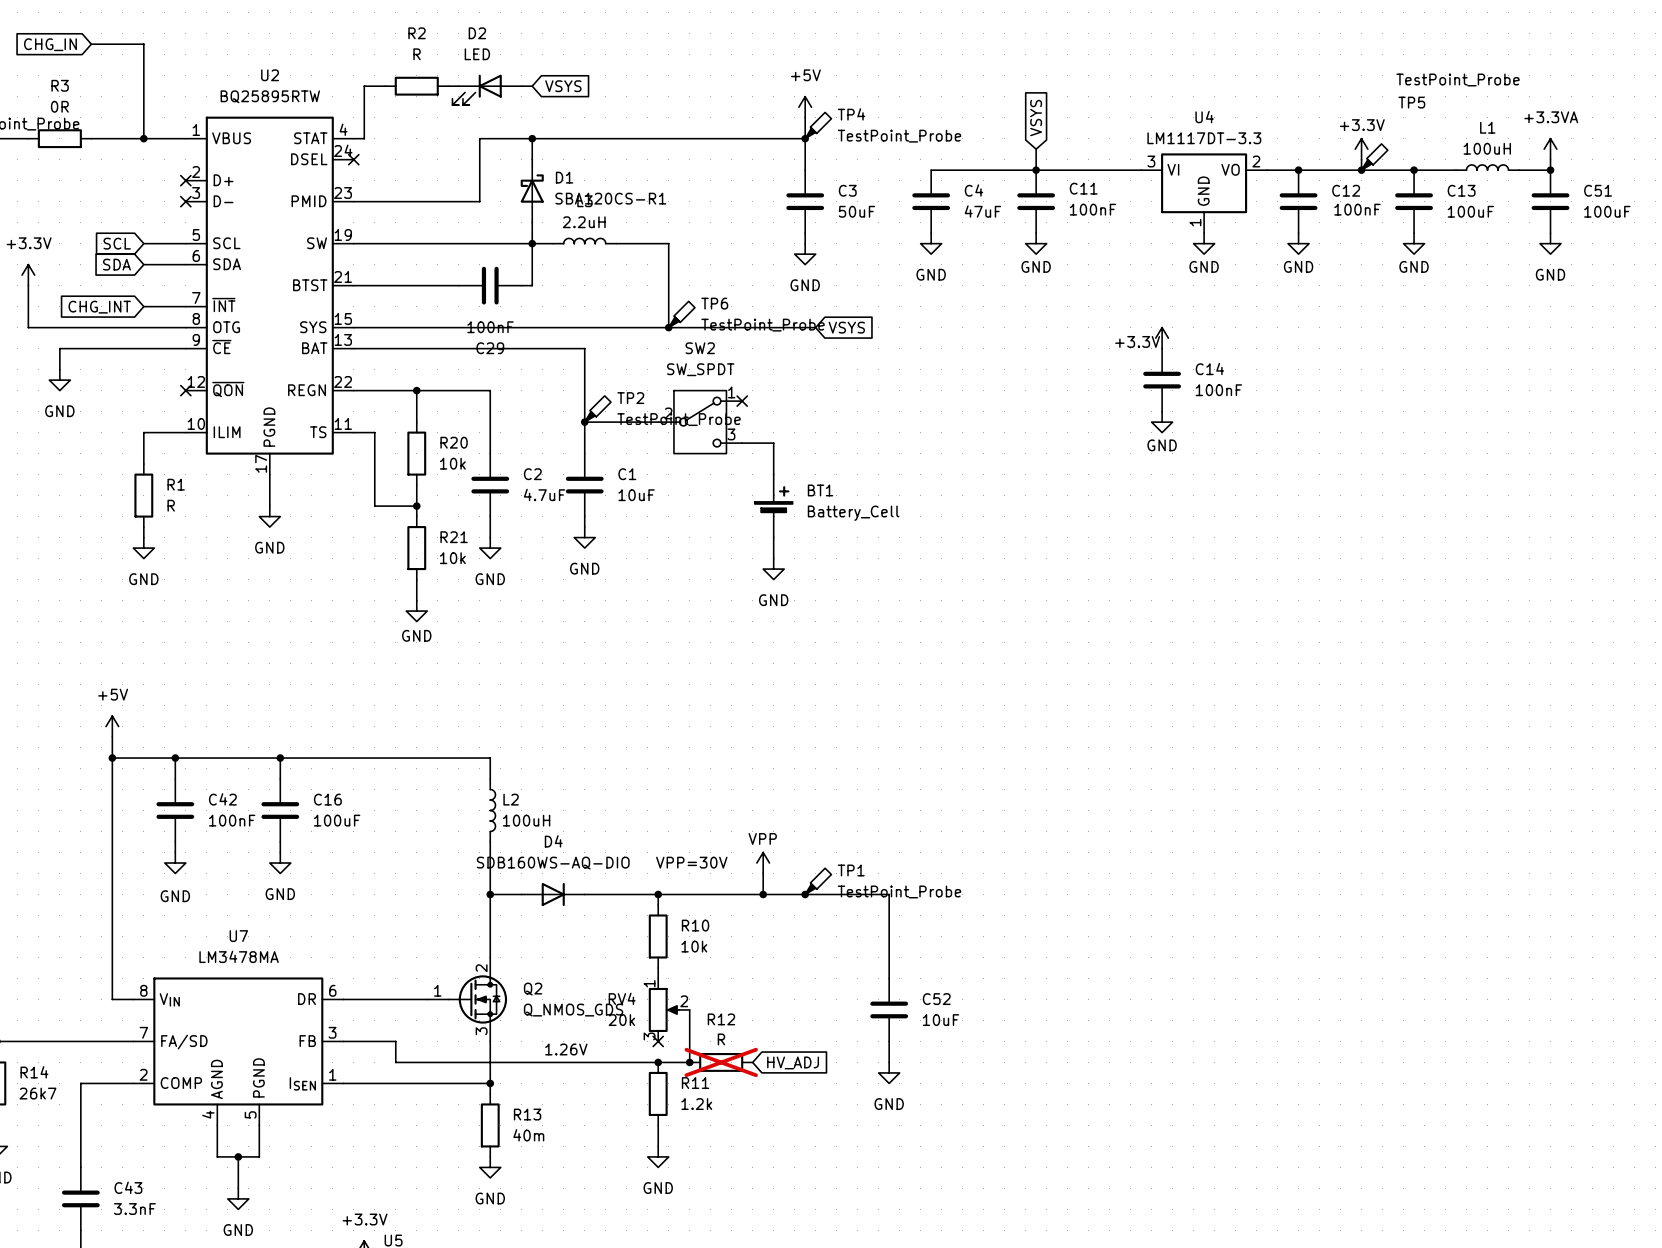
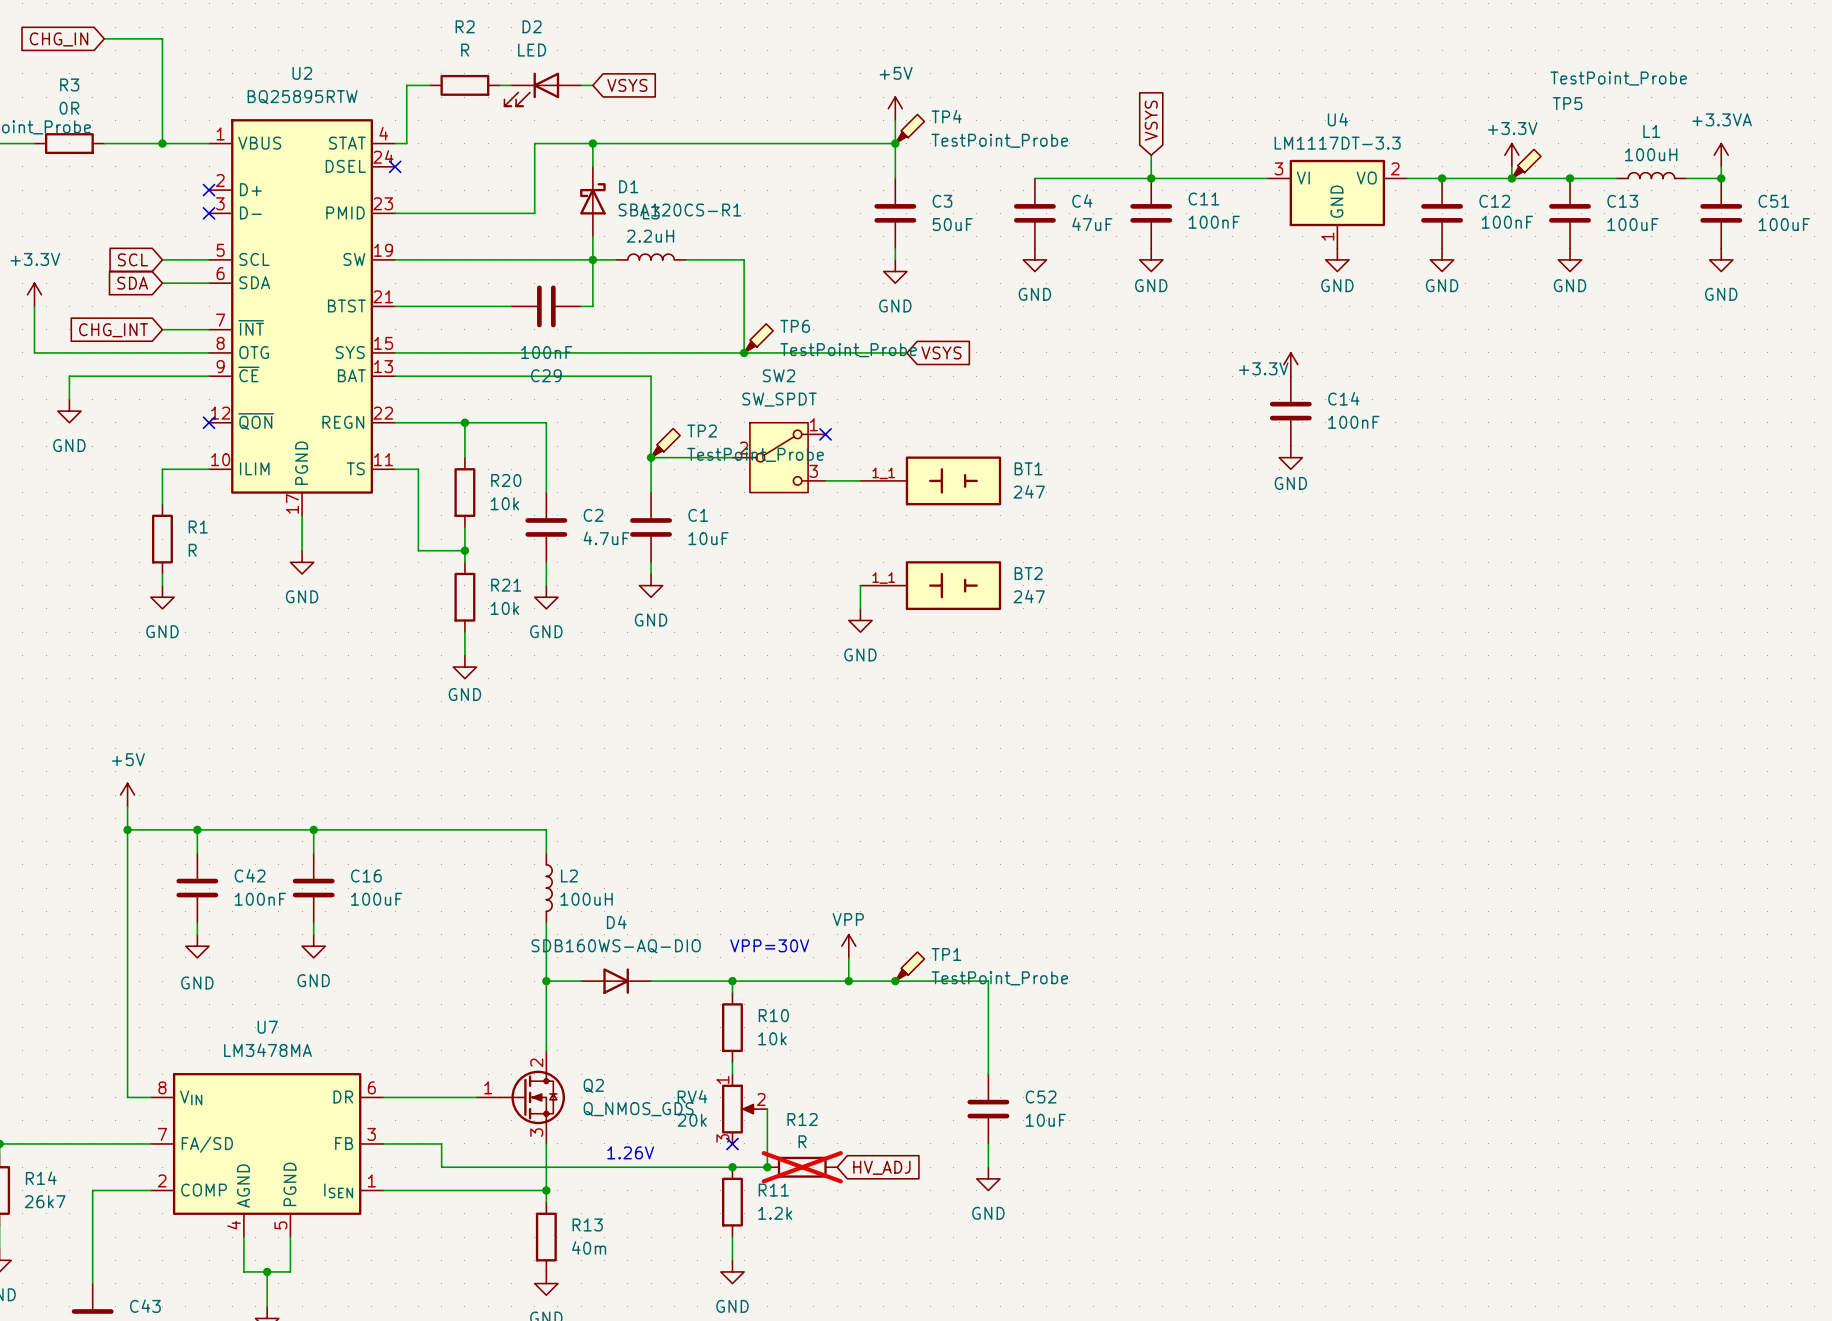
wire: (773, 443) (773, 474) -> none
BT1 symbol: [754, 474, 793, 538] -> [860, 456, 1002, 506]
BT1 name position: BT1 (820, 490) -> BT1 (1028, 468)
BT1 value: Battery_Cell (853, 513) -> 247 (1029, 491)
BT2: none -> 247 (930, 585)

